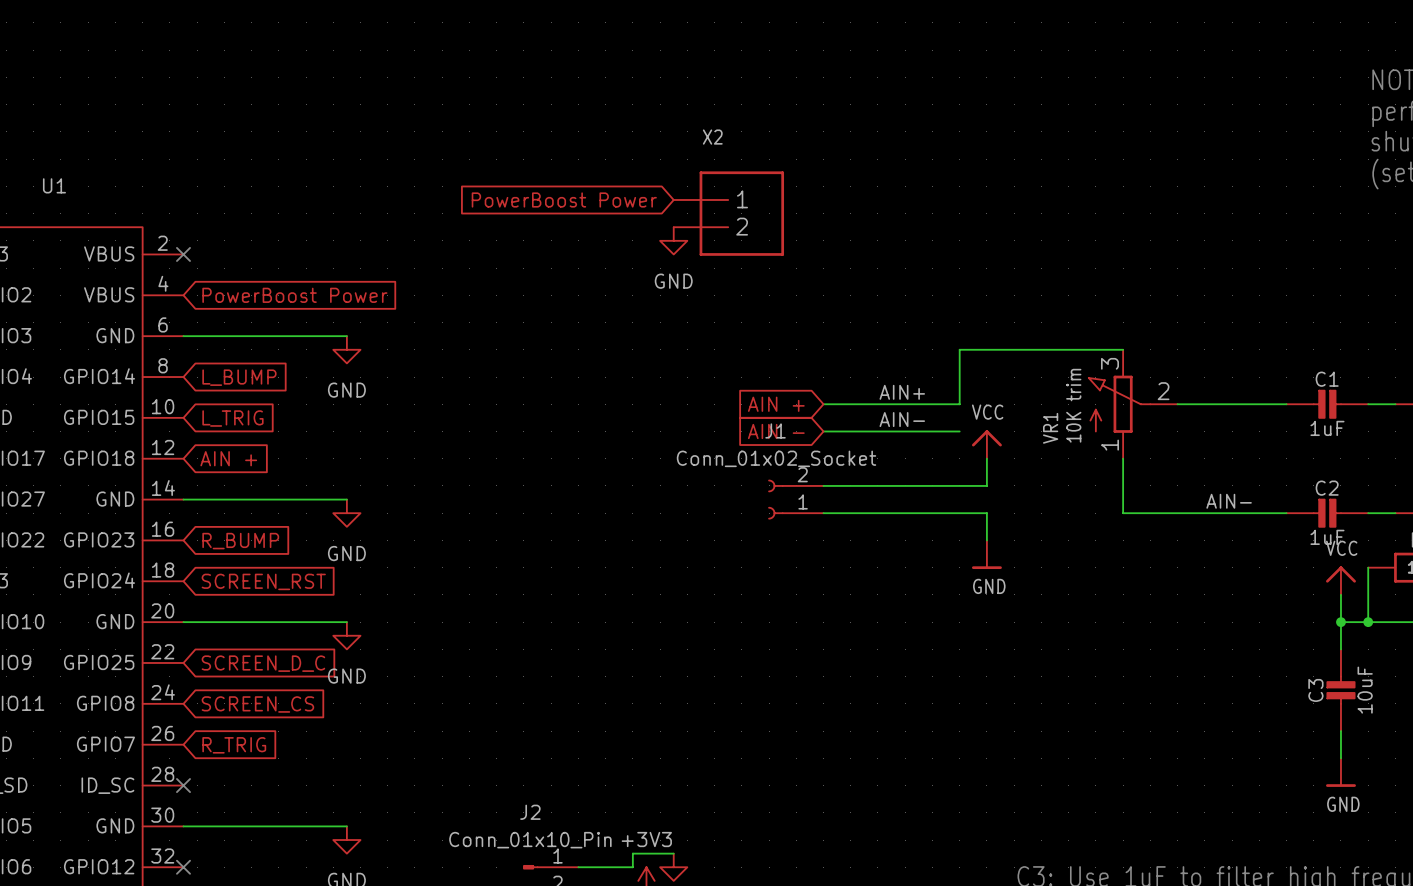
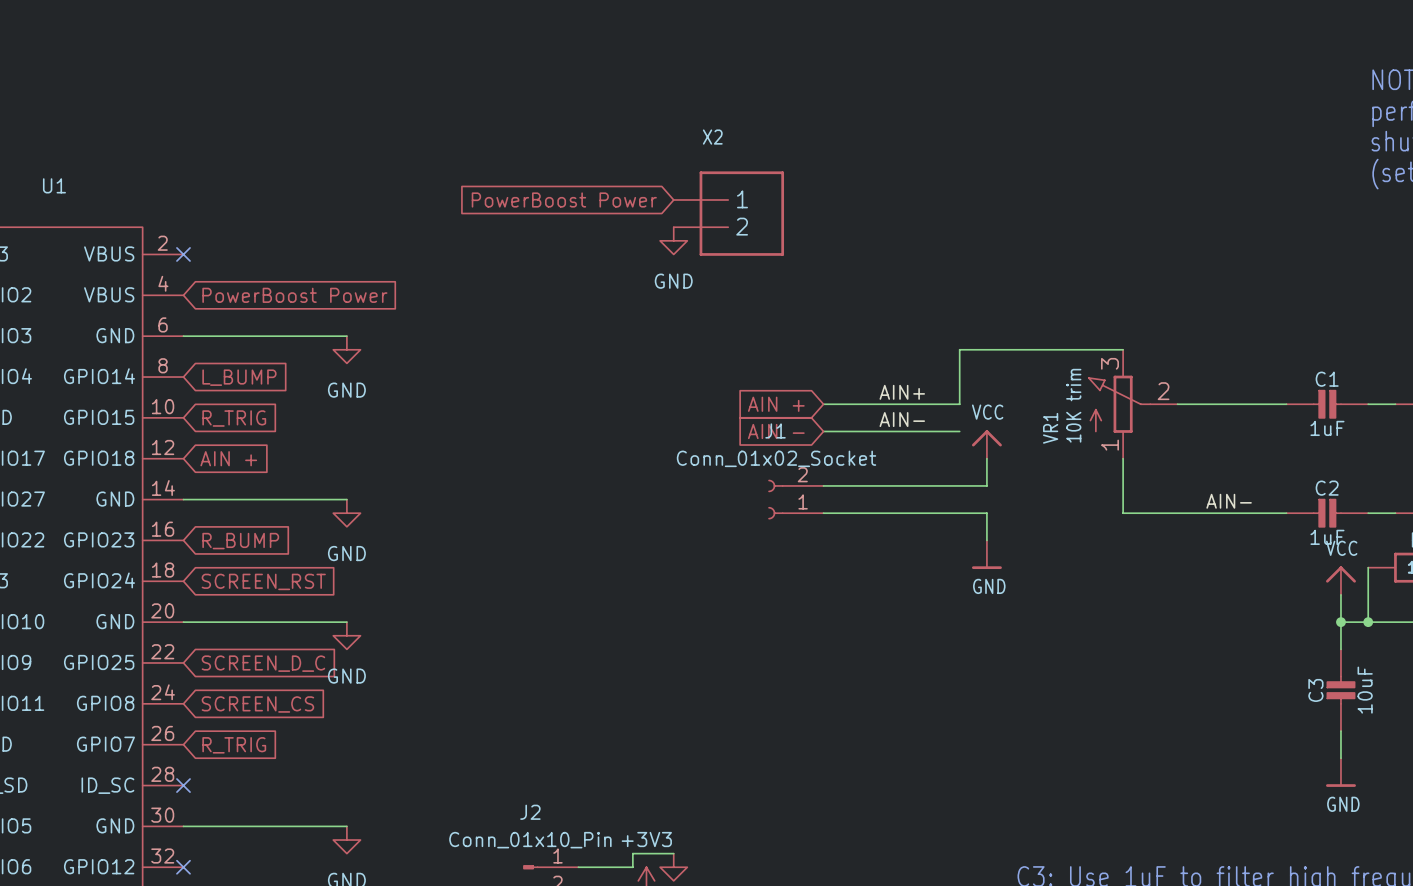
global label: L_TRIG (232, 418) -> R_TRIG (234, 418)

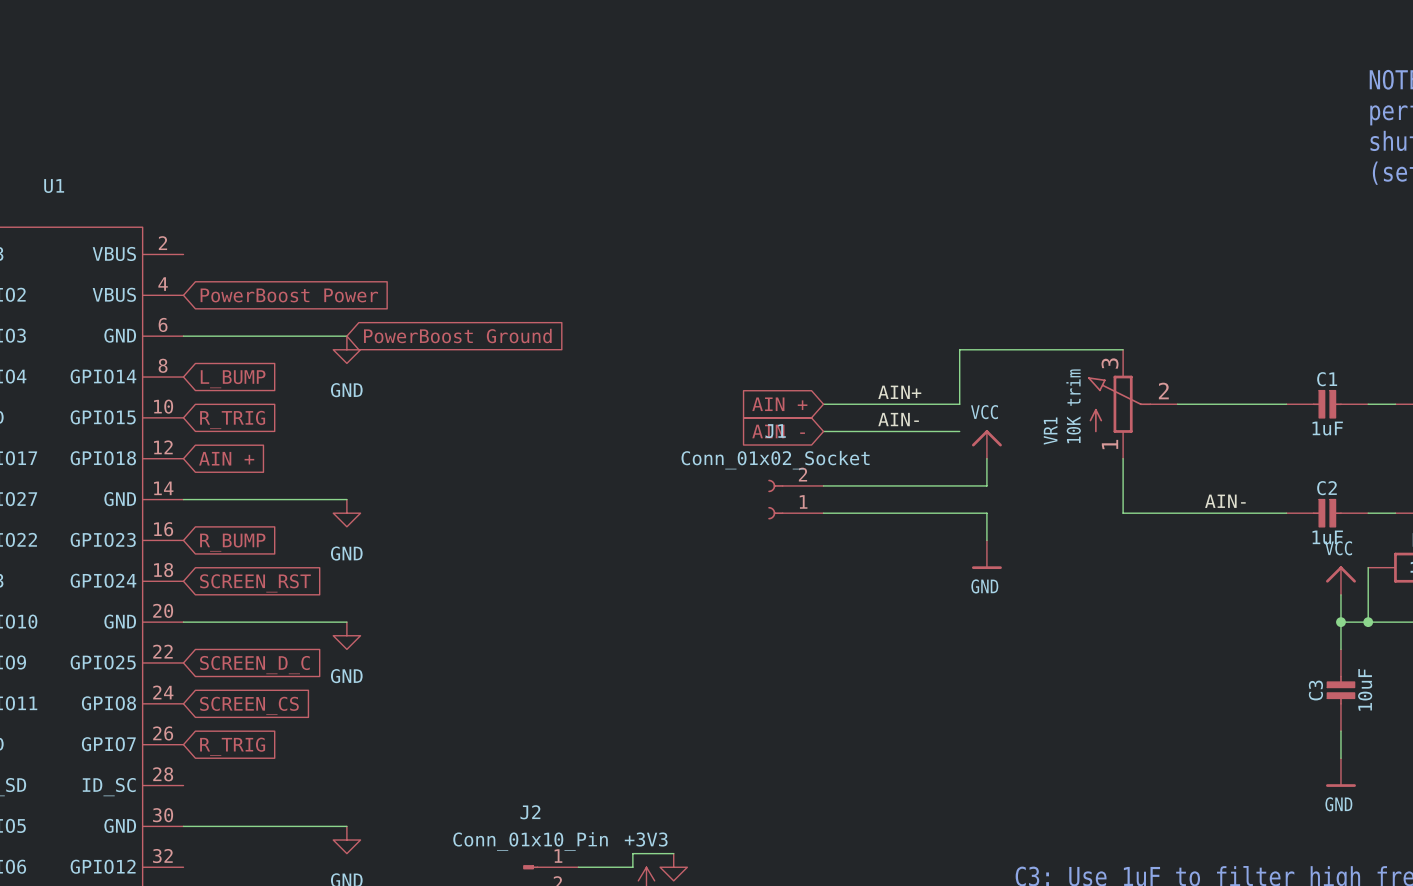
global label: PowerBoost Power (564, 199) -> none
X2: (728, 213) -> none
power symbol: GND (673, 240) -> none
no-connect mark: (183, 254) -> none
global label: none -> PowerBoost Ground (457, 336)
no-connect mark: (183, 785) -> none
no-connect mark: (183, 867) -> none

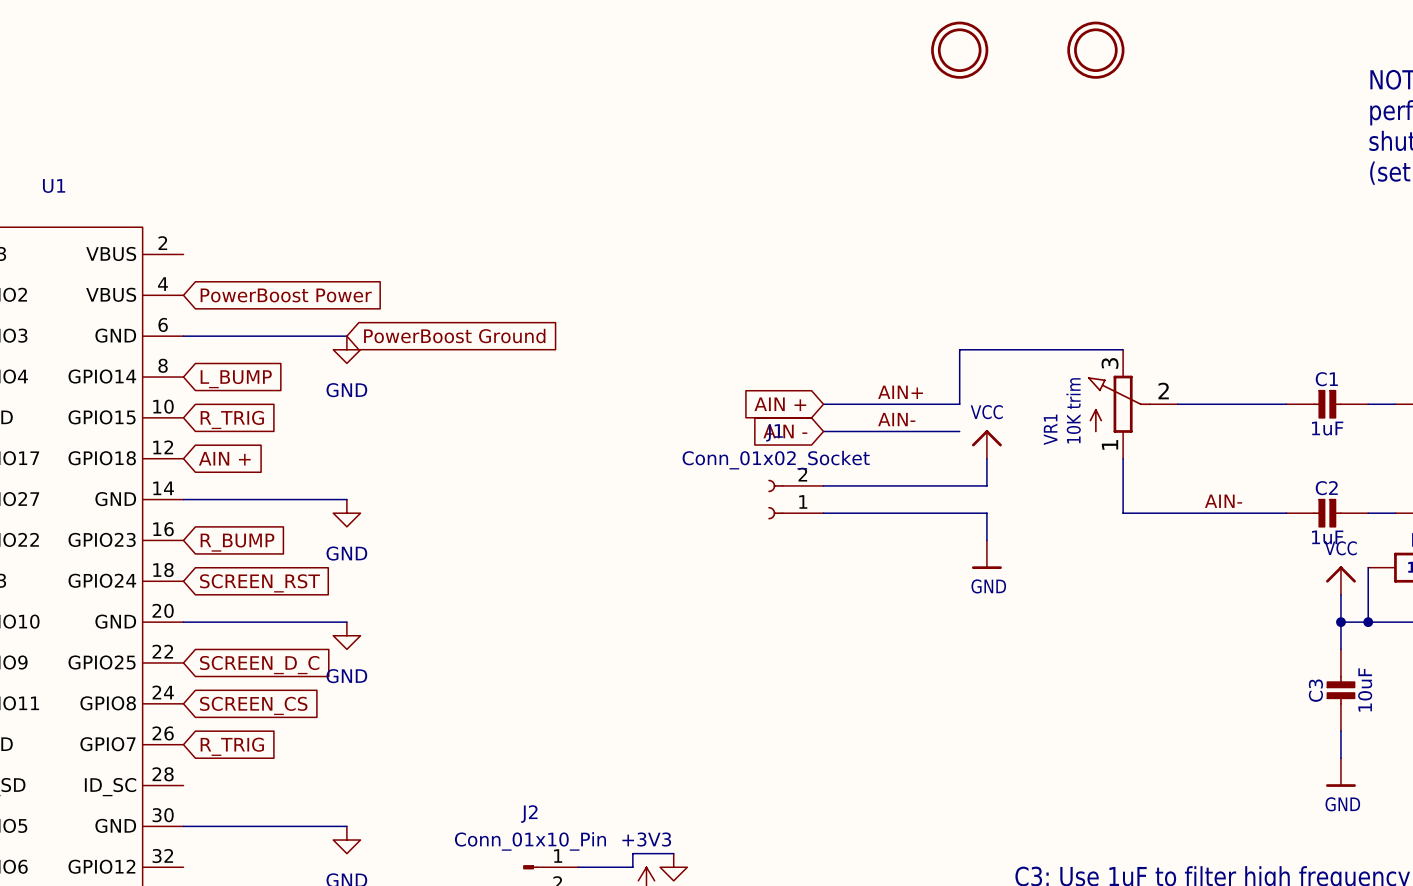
part: none -> (959, 50)
part: none -> (1095, 50)

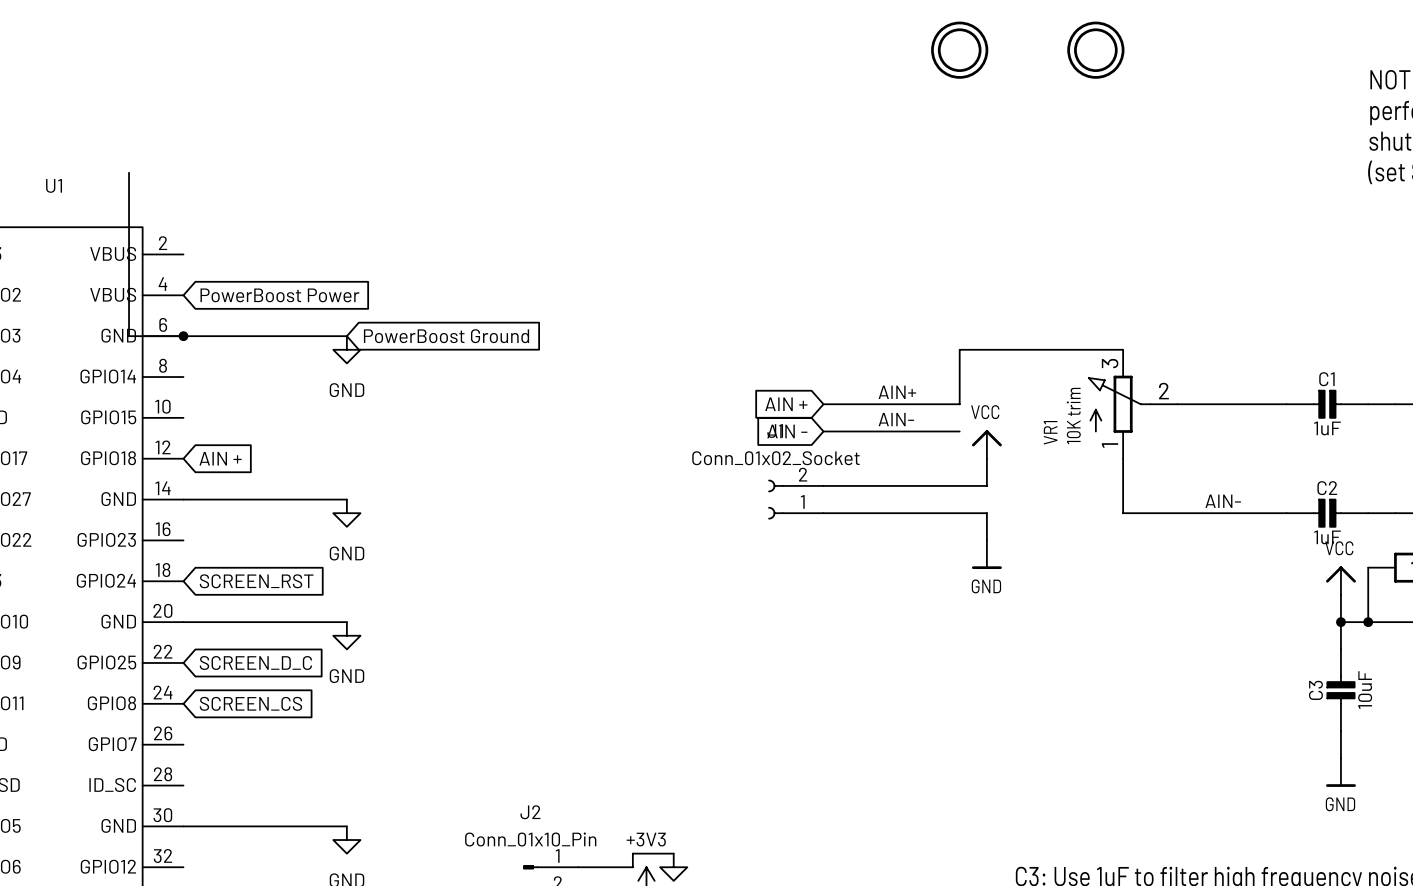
wire: none -> (129, 172) (129, 336) (183, 336)
junction: none -> (183, 336)
global label: L_BUMP (236, 379) -> none
global label: R_TRIG (232, 419) -> none
global label: R_BUMP (237, 542) -> none
global label: R_TRIG (232, 746) -> none

